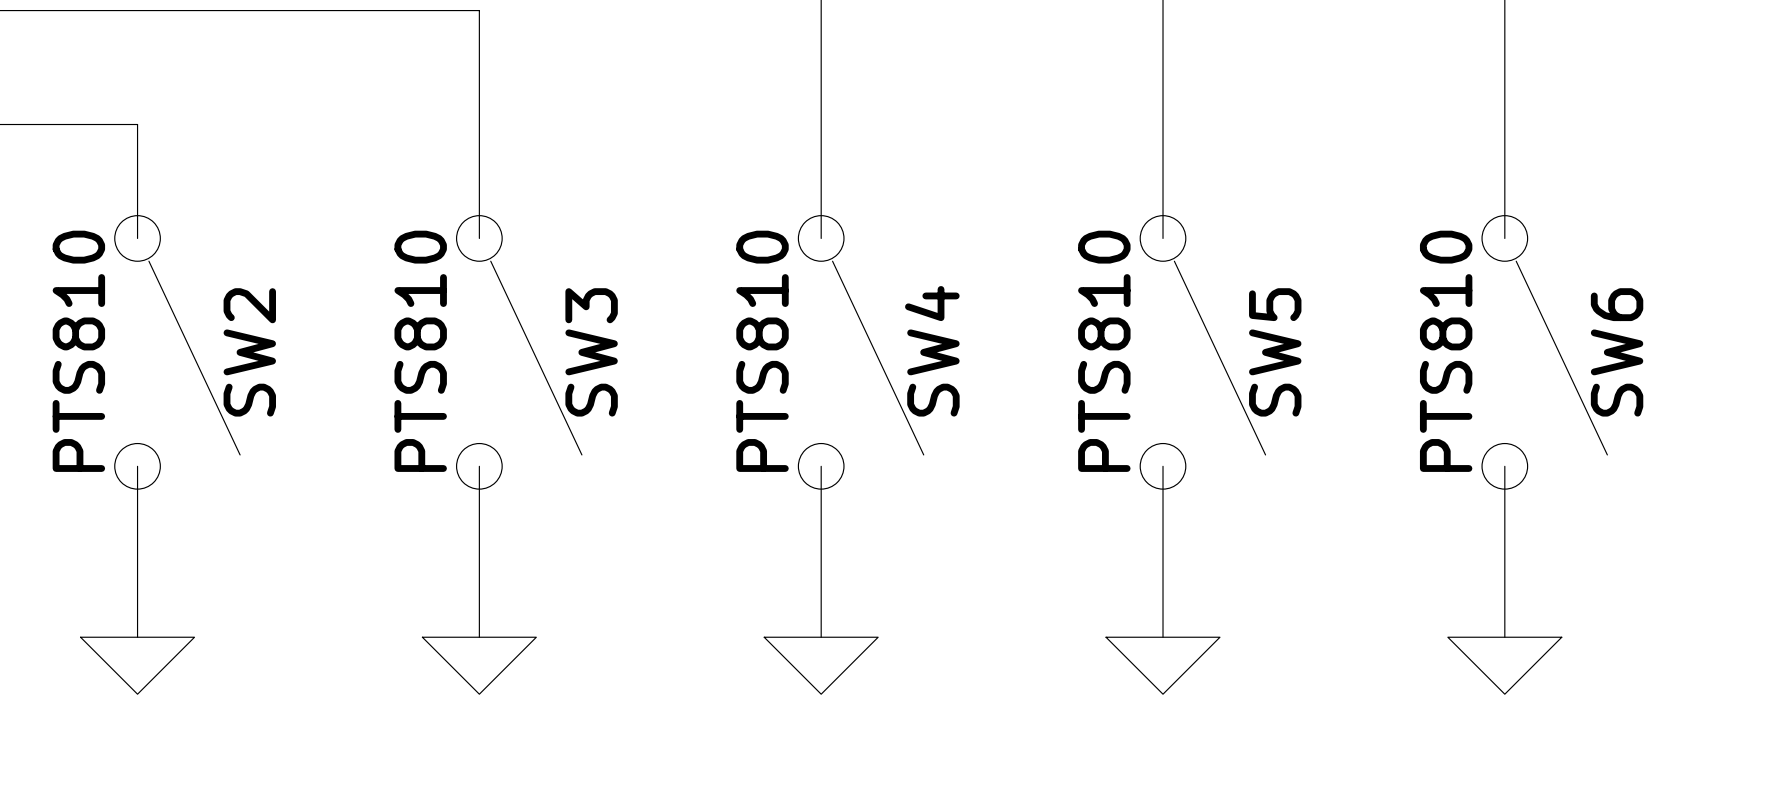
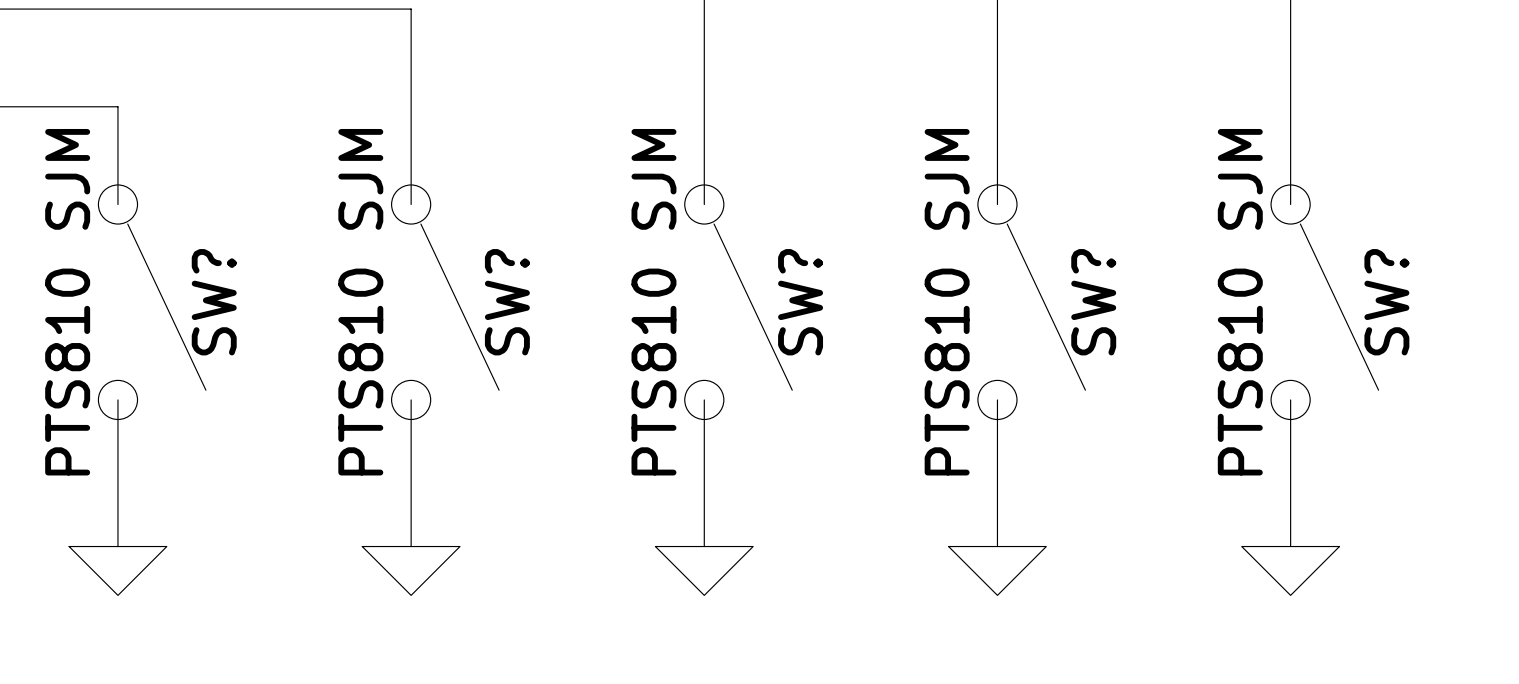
SW2 value: PTS810 (78, 351) -> PTS810 SJM (67, 302)
SW3 value: PTS810 (420, 351) -> PTS810 SJM (360, 302)
SW4 value: PTS810 (762, 351) -> PTS810 SJM (653, 302)
SW4 name: SW4 (932, 351) -> SW? (800, 302)
SW5 value: PTS810 (1104, 351) -> PTS810 SJM (947, 302)
SW6 value: PTS810 (1446, 351) -> PTS810 SJM (1240, 302)
SW2 name: SW2 (249, 352) -> SW? (214, 302)
SW3 name: SW3 (591, 352) -> SW? (507, 302)
SW5 name: SW5 (1275, 352) -> SW? (1093, 302)
SW6 name: SW6 (1617, 352) -> SW? (1386, 302)

